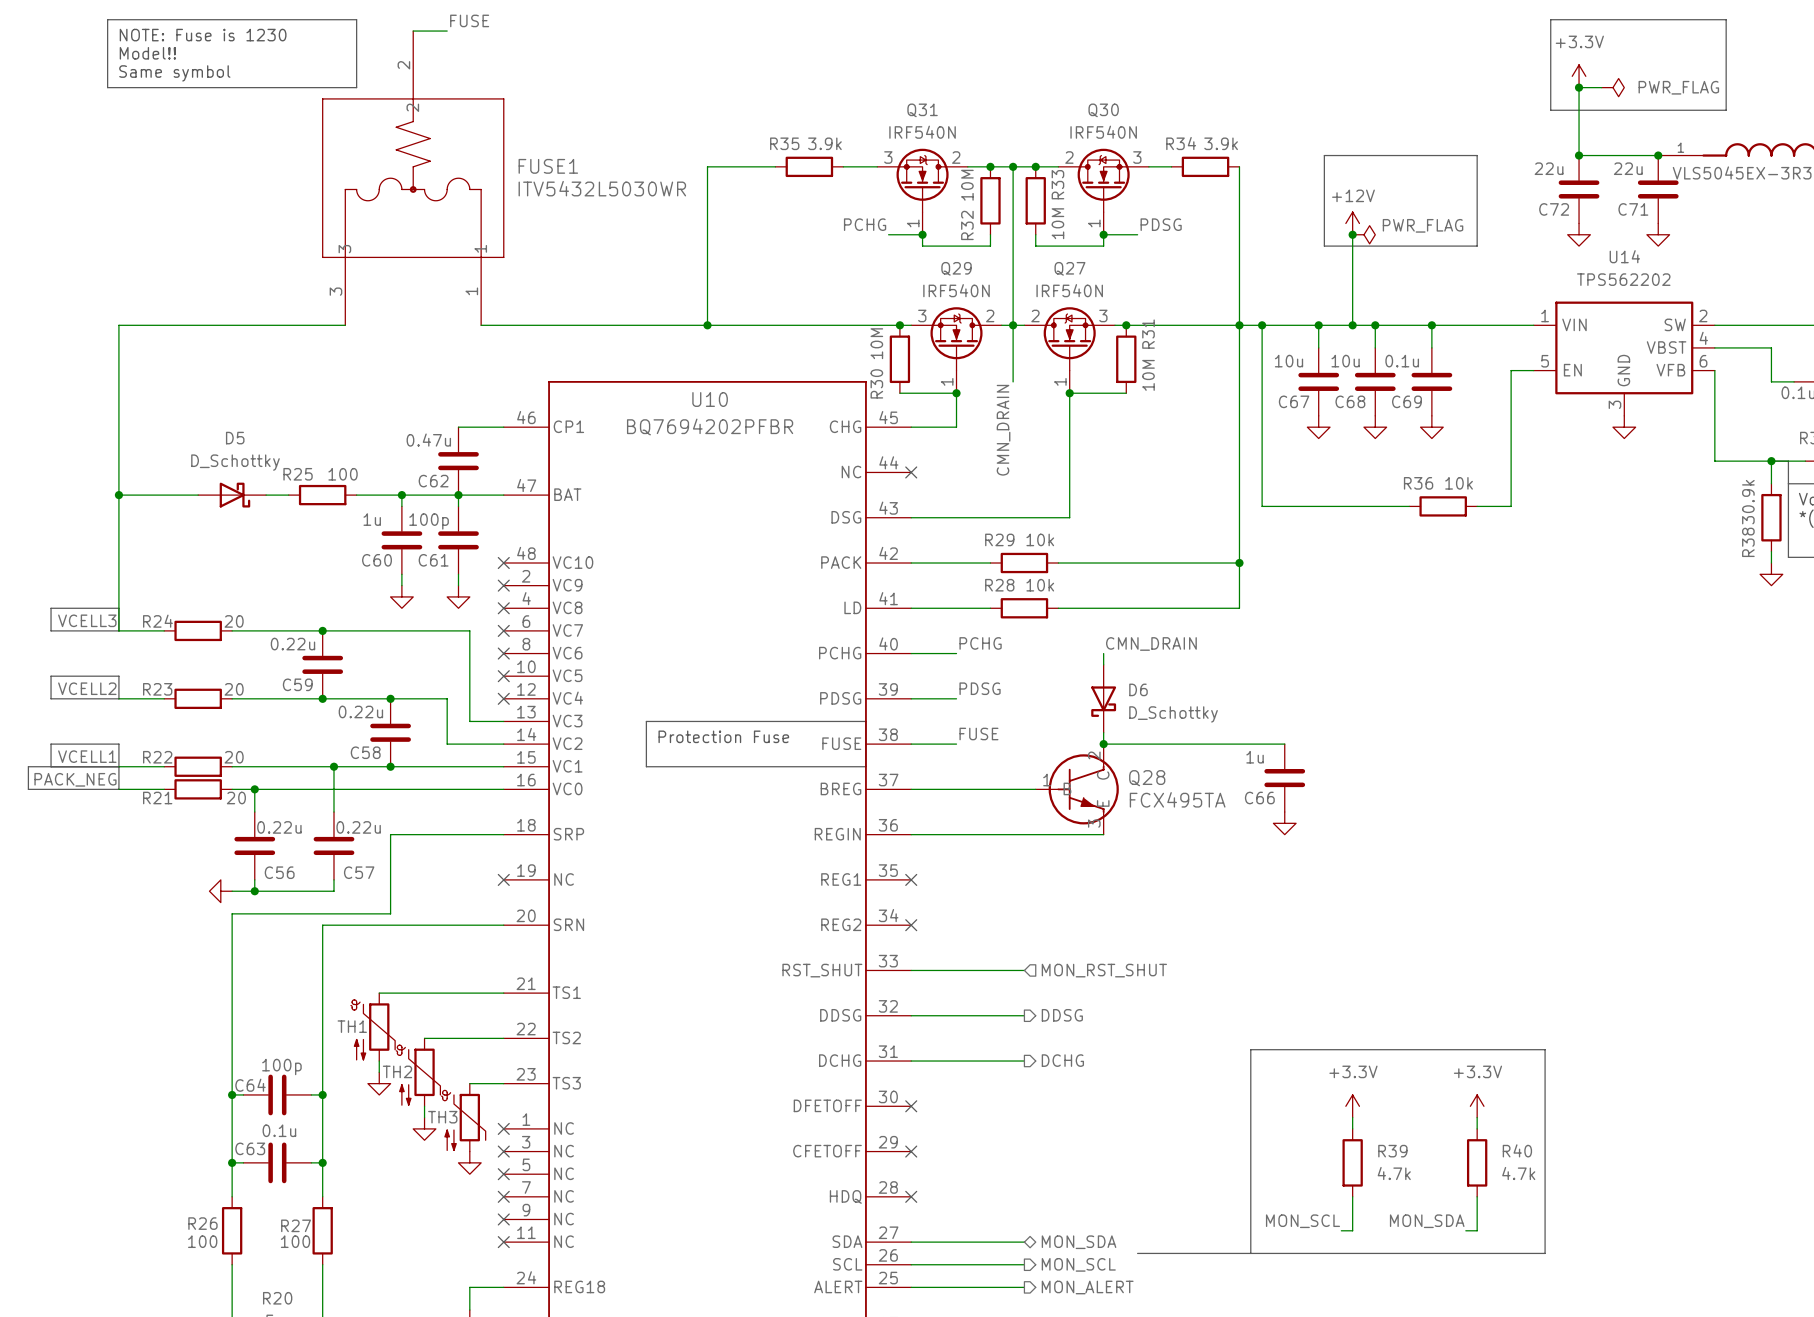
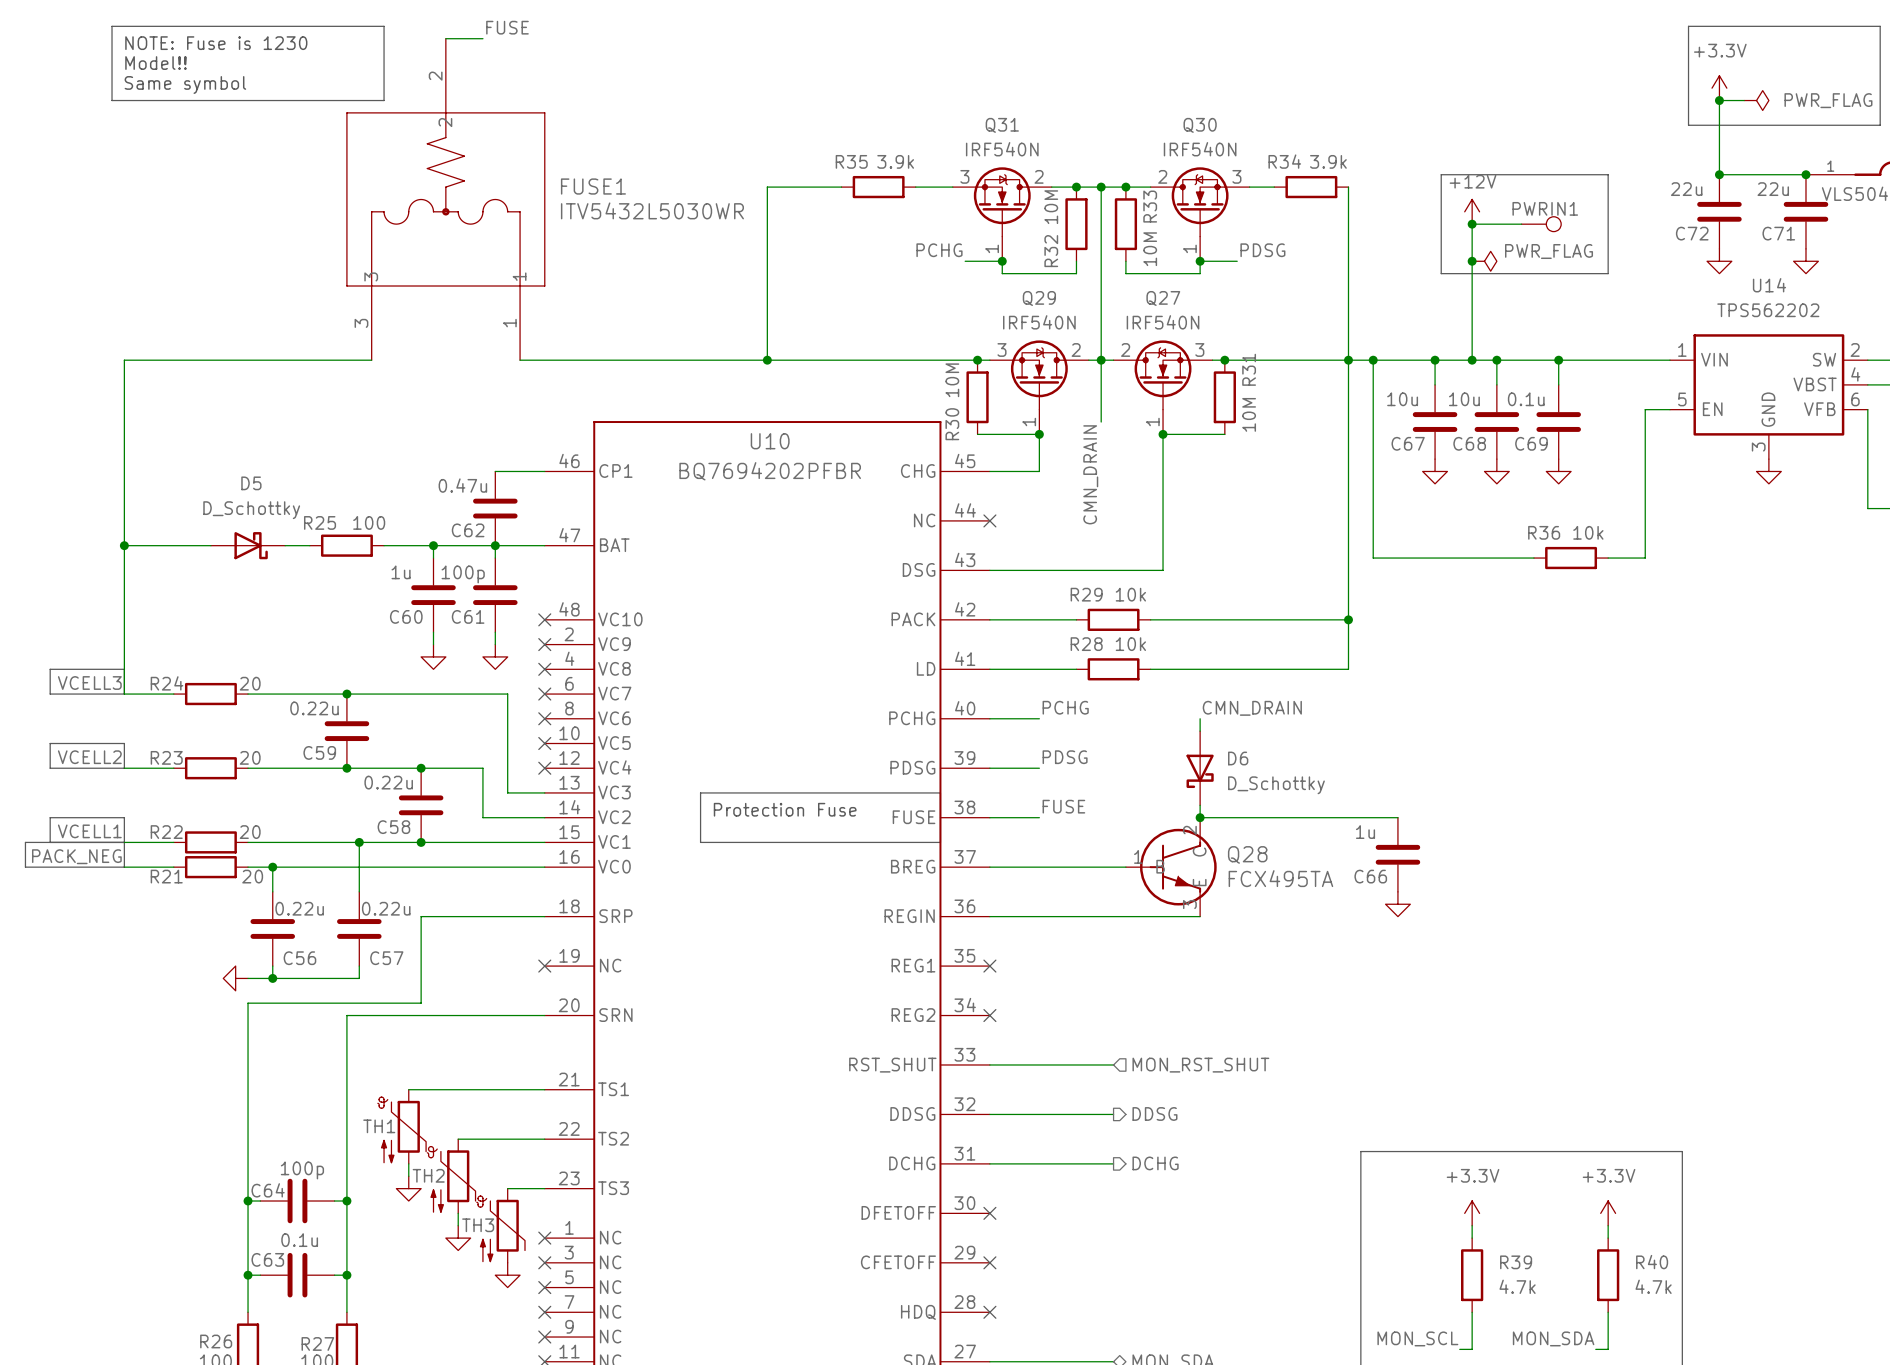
junction: none -> (1472, 224)
wire: none -> (1521, 224) (1472, 224) (1472, 261)
PWRIN1: none -> (1541, 224)
power symbol position: +12V (1352, 223) -> +12V (1472, 211)

